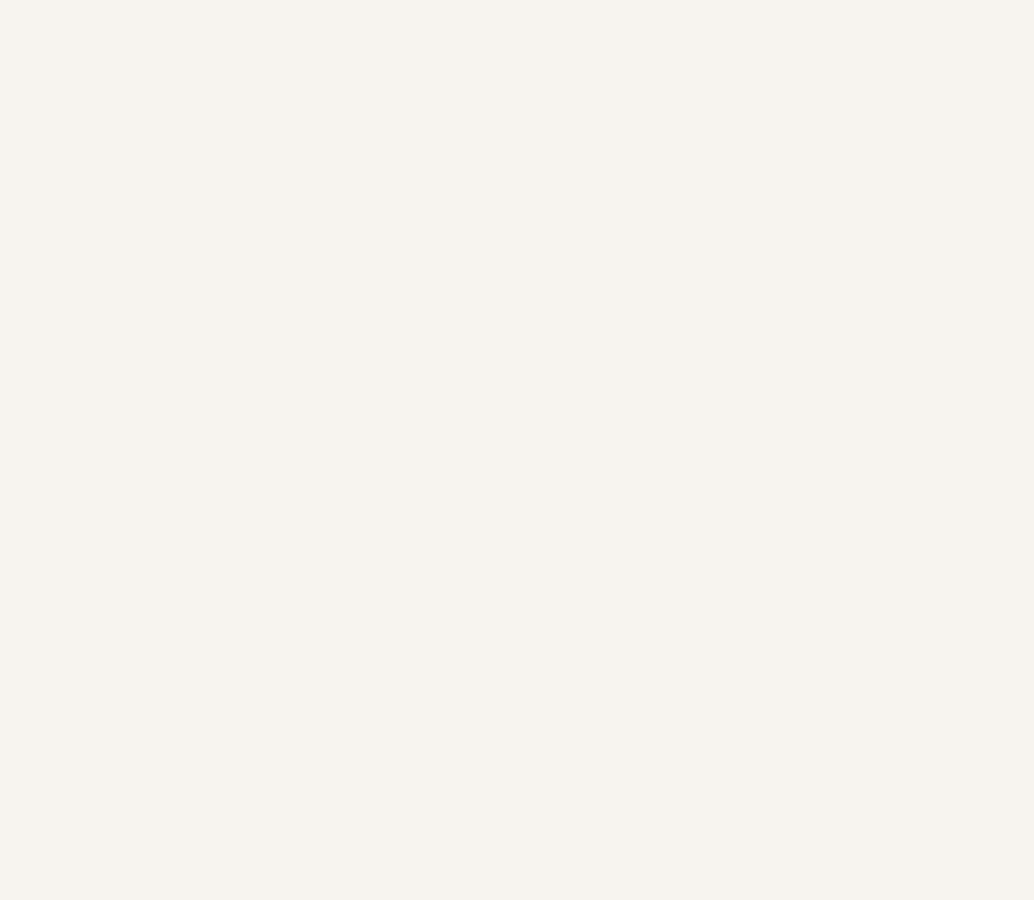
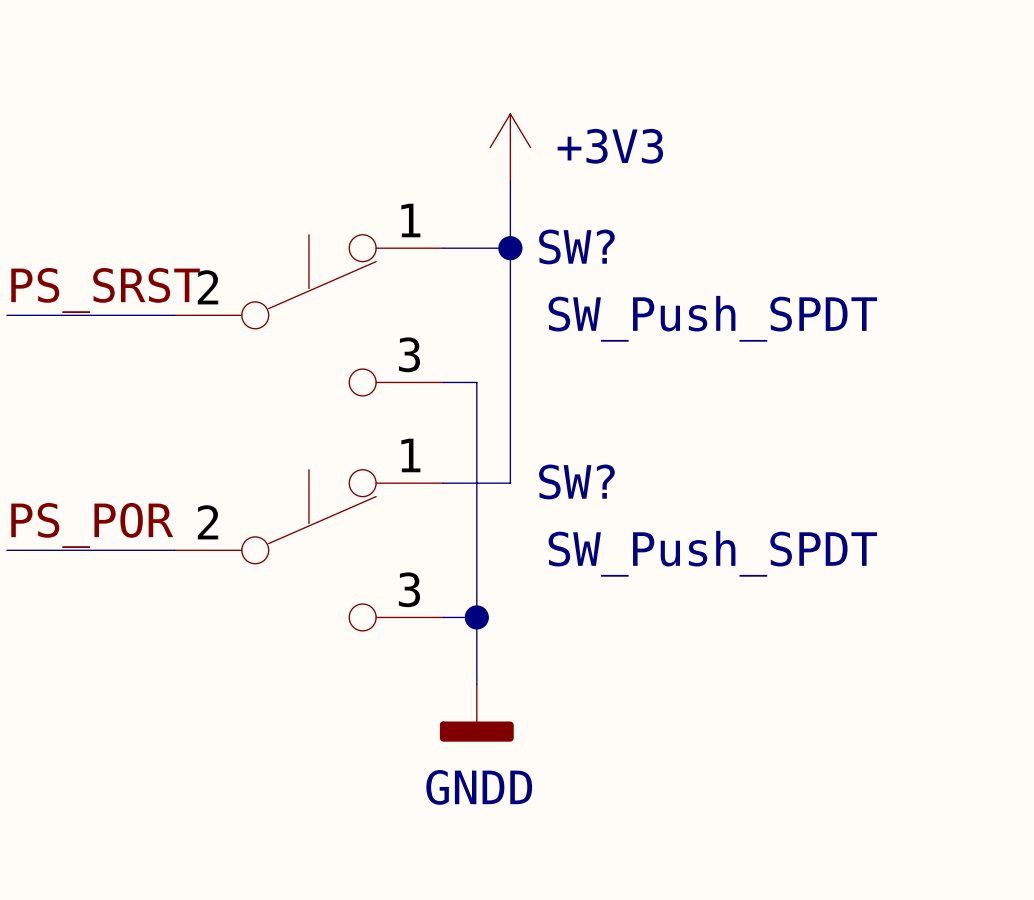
power symbol: none -> +3V3 (510, 147)
wire: none -> (510, 181) (510, 483) (443, 483)
wire: none -> (443, 248) (510, 248)
junction: none -> (510, 248)
label: none -> PS_SRST (105, 290)
wire: none -> (6, 315) (174, 315)
SW?: none -> SW_Push_SPDT (308, 315)
wire: none -> (443, 382) (476, 382) (476, 684)
label: none -> PS_POR (92, 525)
wire: none -> (6, 550) (174, 550)
SW?: none -> SW_Push_SPDT (308, 550)
wire: none -> (443, 617) (476, 617)
junction: none -> (476, 617)
power symbol: none -> GNDD (476, 713)

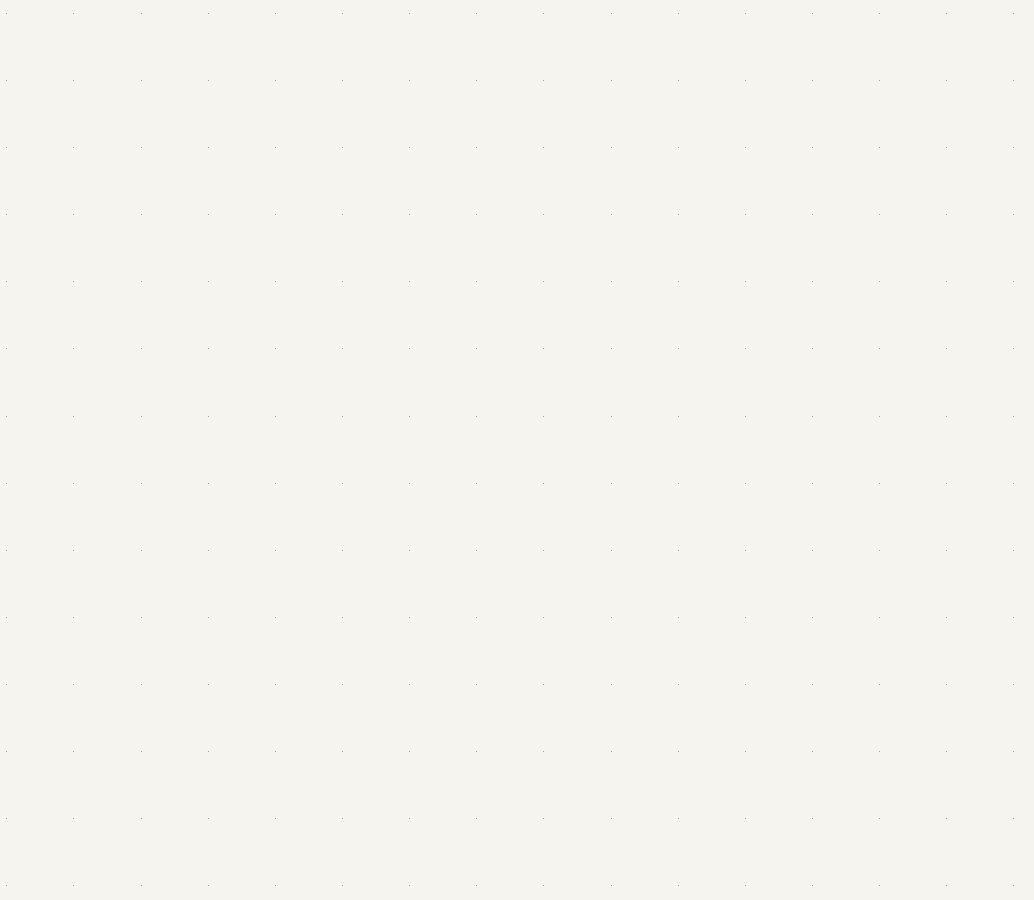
power symbol: +3V3 (510, 147) -> none
wire: (510, 181) (510, 483) (443, 483) -> none
wire: (443, 248) (510, 248) -> none
junction: (510, 248) -> none
label: PS_SRST (105, 290) -> none
wire: (6, 315) (174, 315) -> none
SW?: SW_Push_SPDT (308, 315) -> none
wire: (443, 382) (476, 382) (476, 684) -> none
label: PS_POR (92, 525) -> none
wire: (6, 550) (174, 550) -> none
SW?: SW_Push_SPDT (308, 550) -> none
wire: (443, 617) (476, 617) -> none
junction: (476, 617) -> none
power symbol: GNDD (476, 713) -> none

